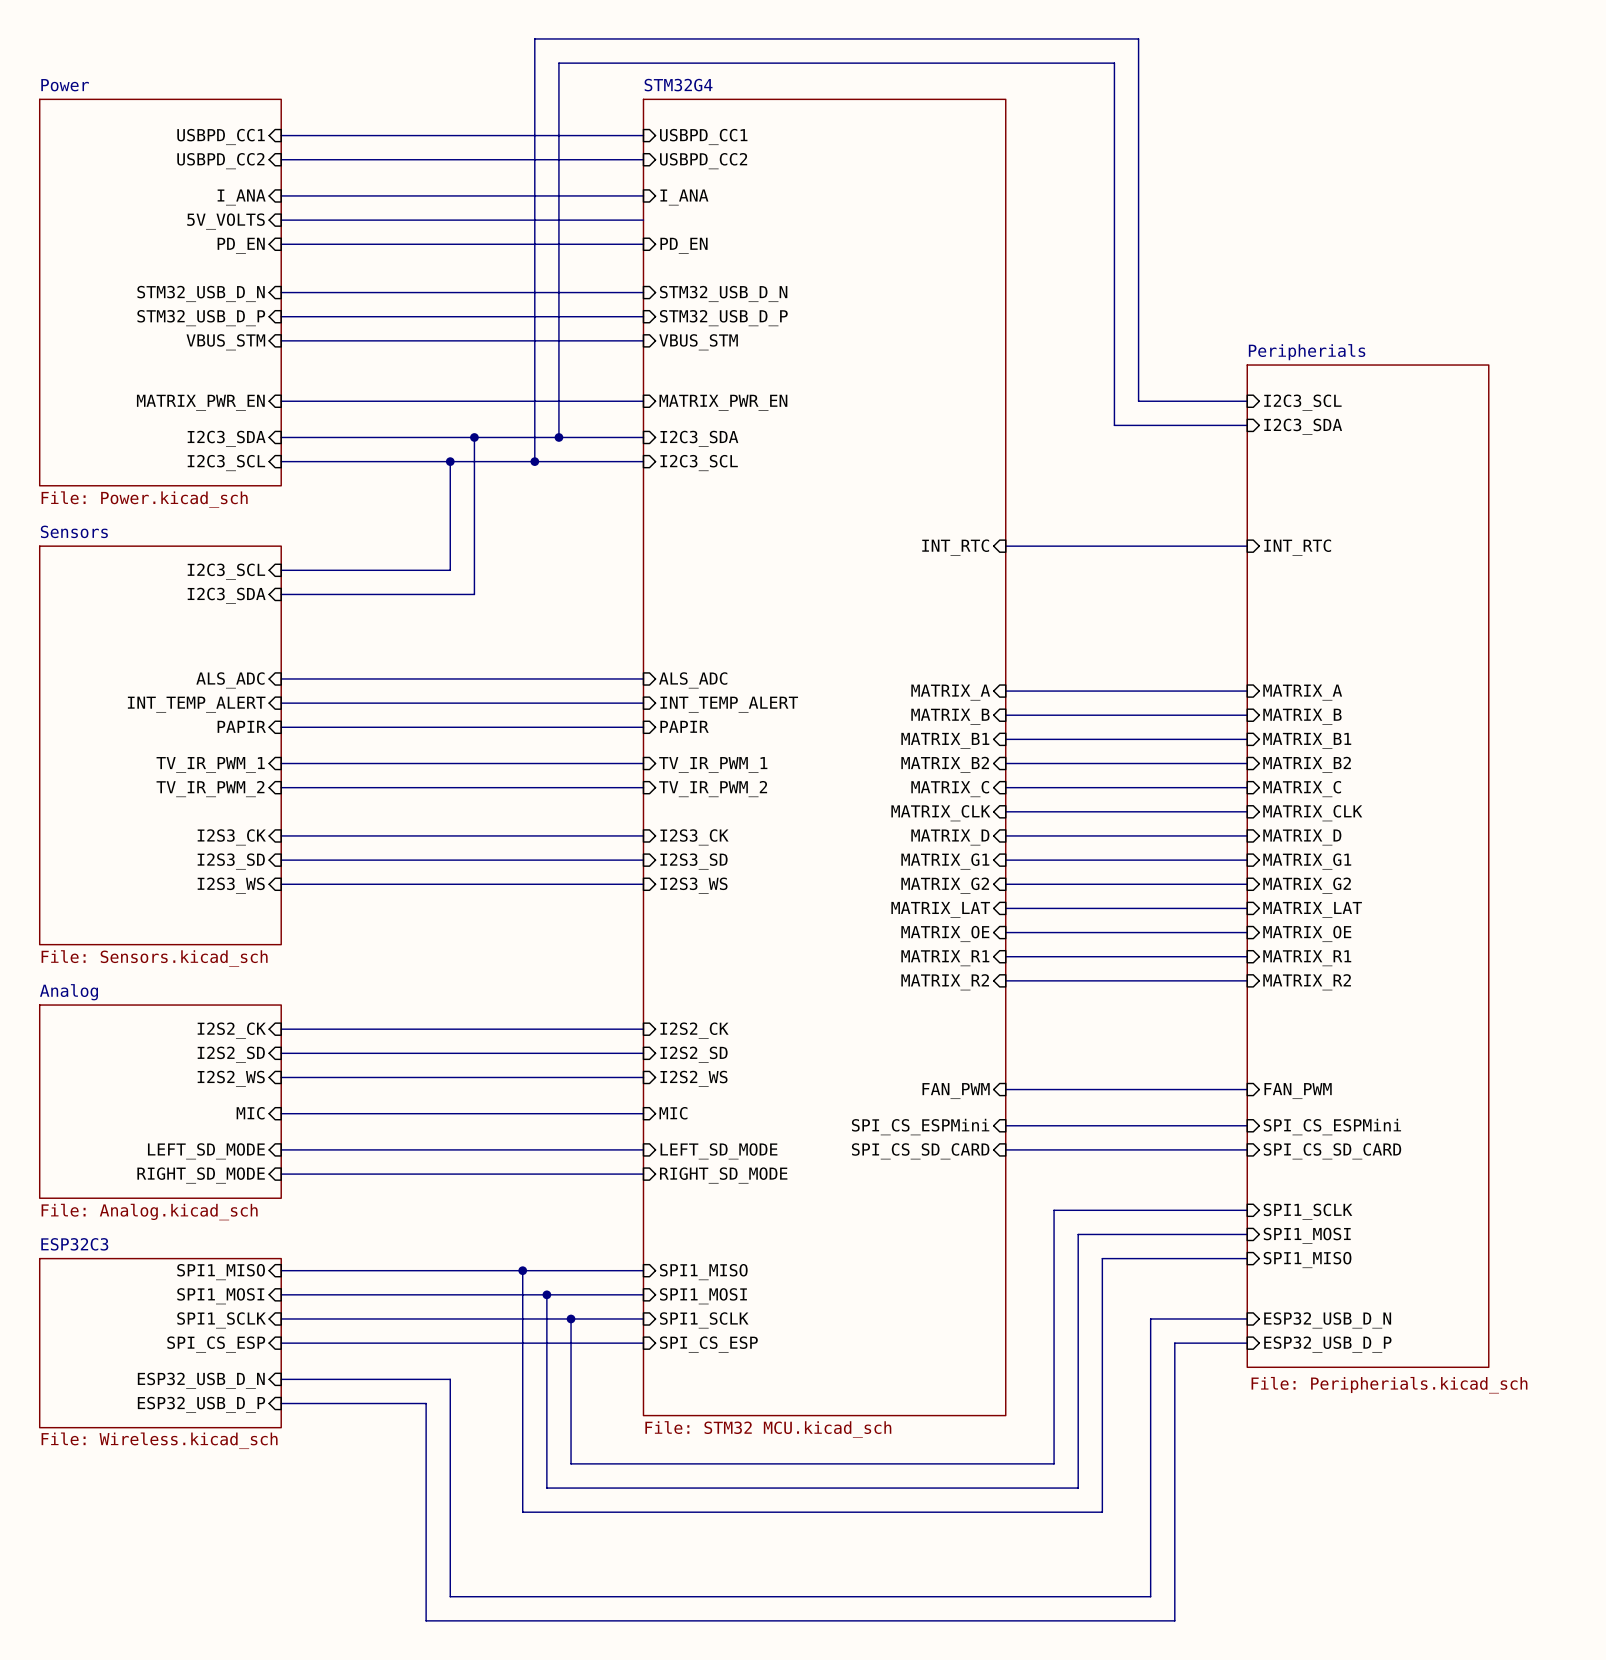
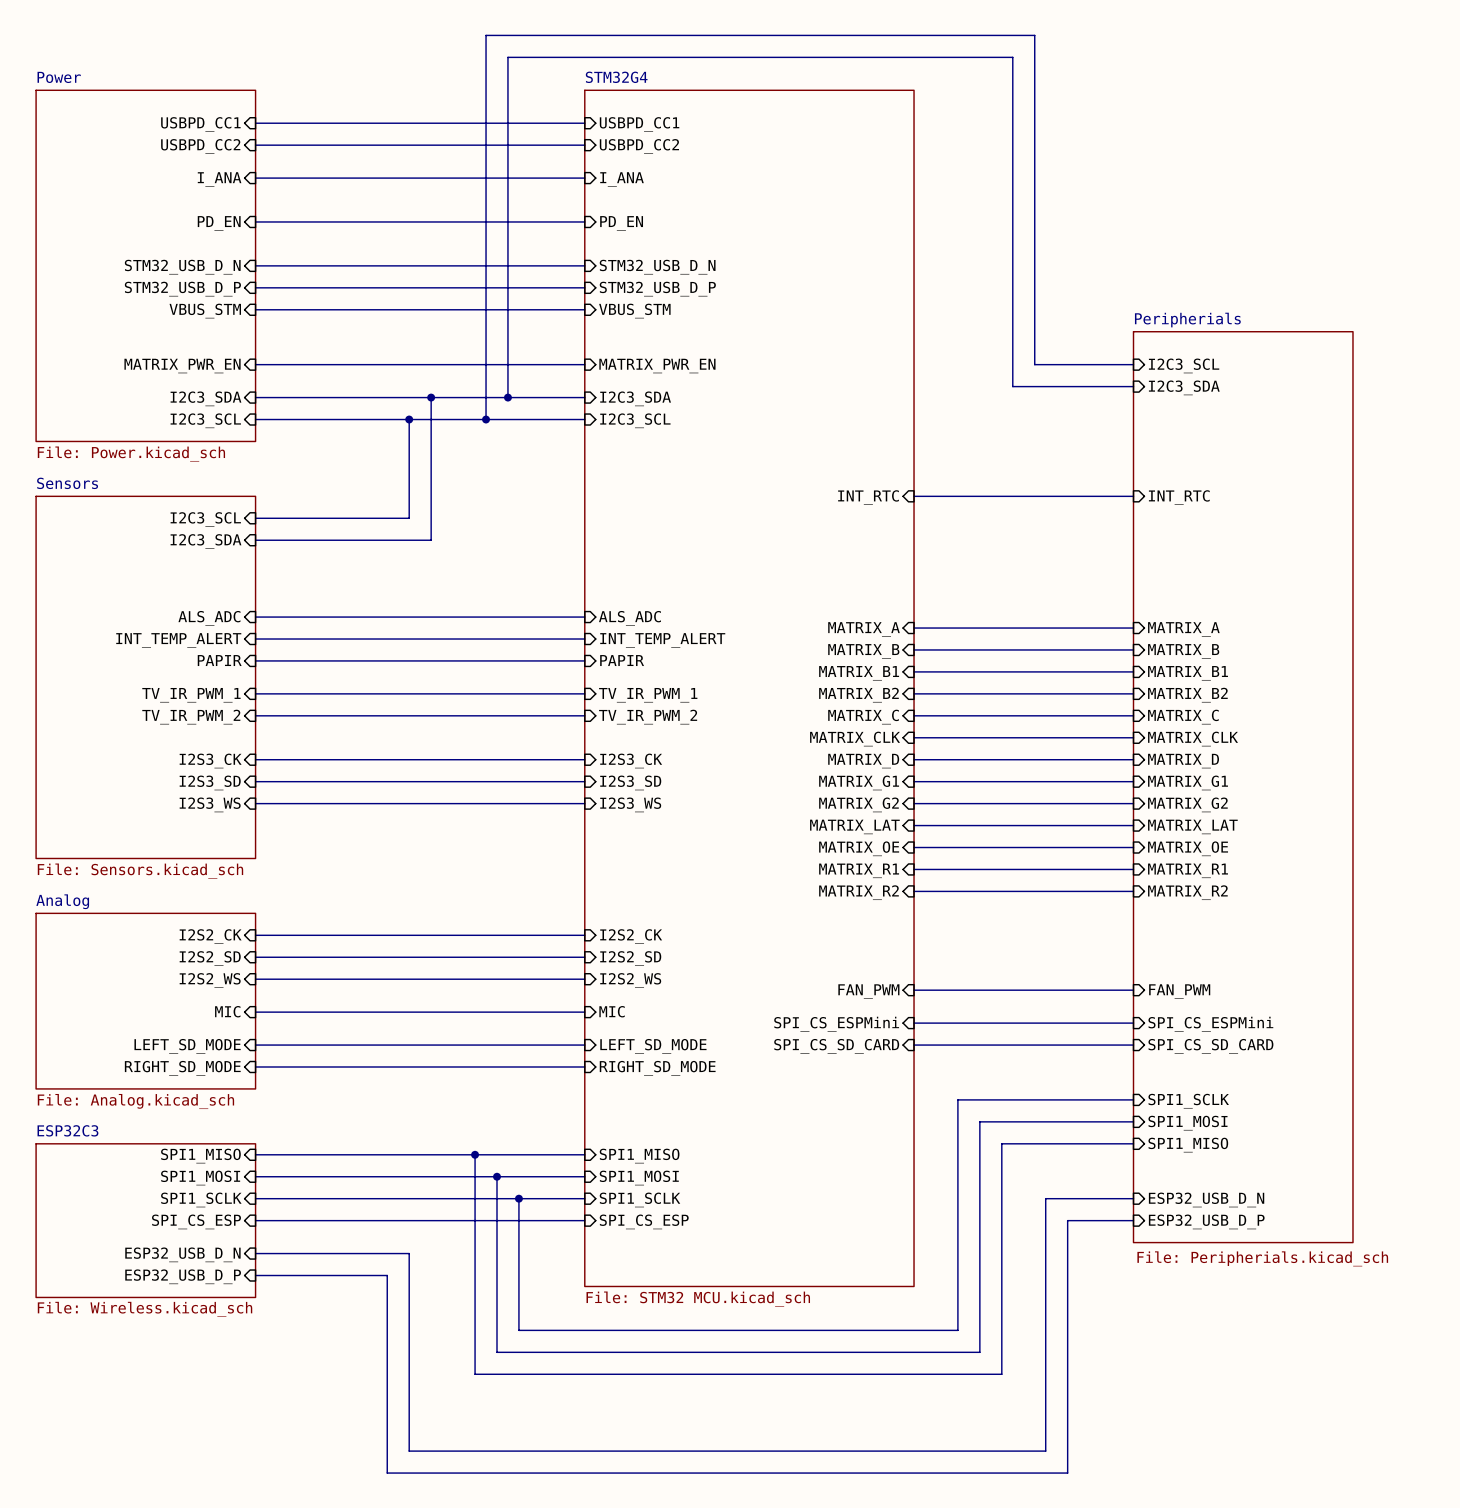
wire: (281, 220) (643, 220) -> none
sheet pin: 5V_VOLTS (226, 221) -> none

